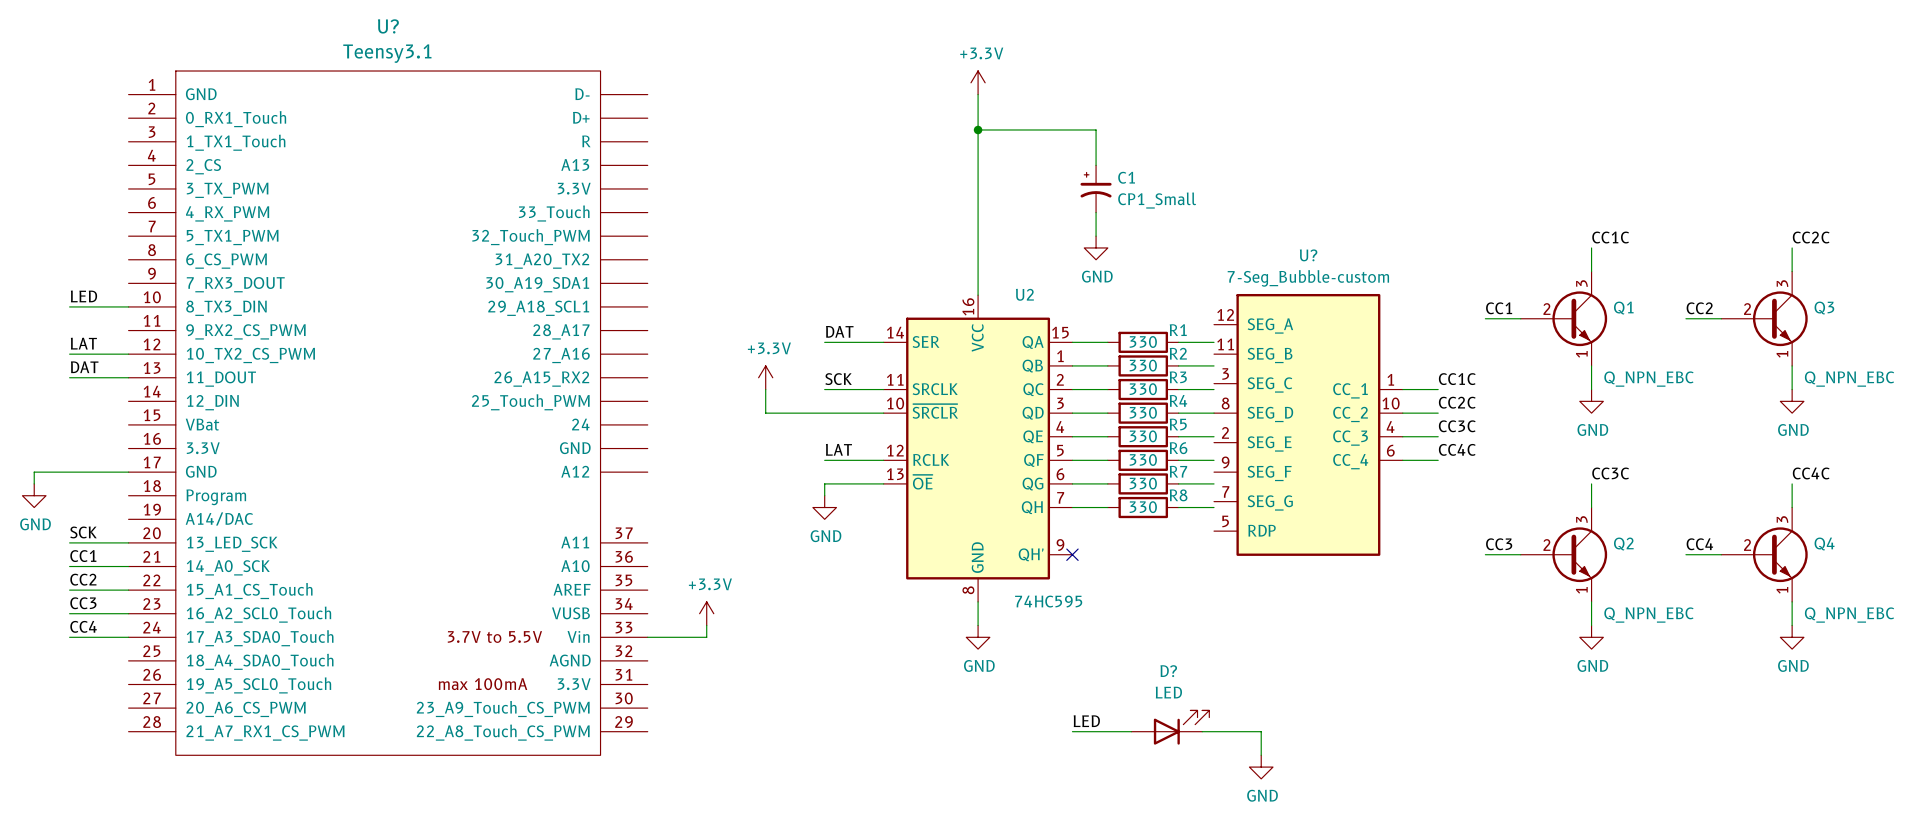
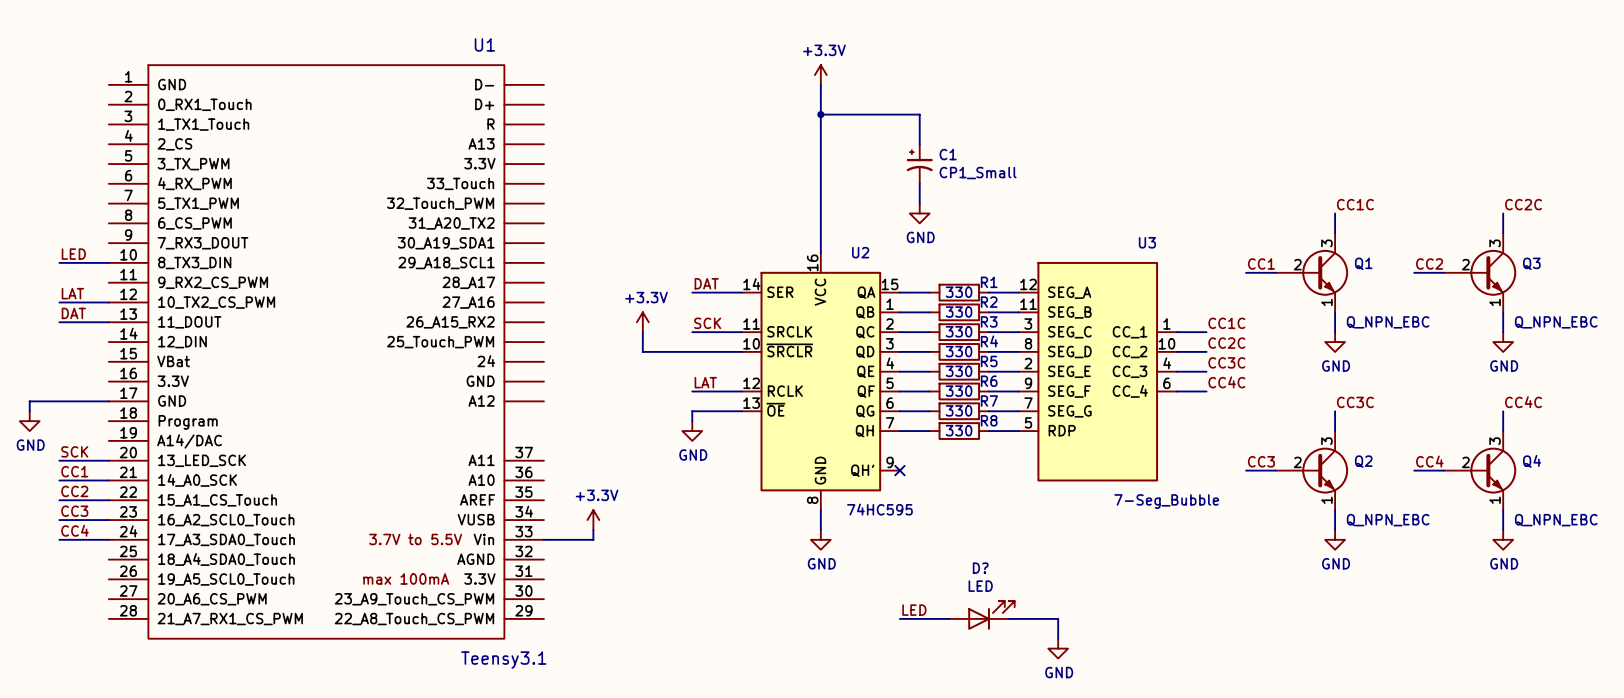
U? name: U? (388, 26) -> U1 (484, 44)
U? value position: Teensy3.1 (387, 53) -> Teensy3.1 (503, 660)
U?: 7-Seg_Bubble-custom (1308, 424) -> none
U3: none -> 7-Seg_Bubble (1097, 371)

